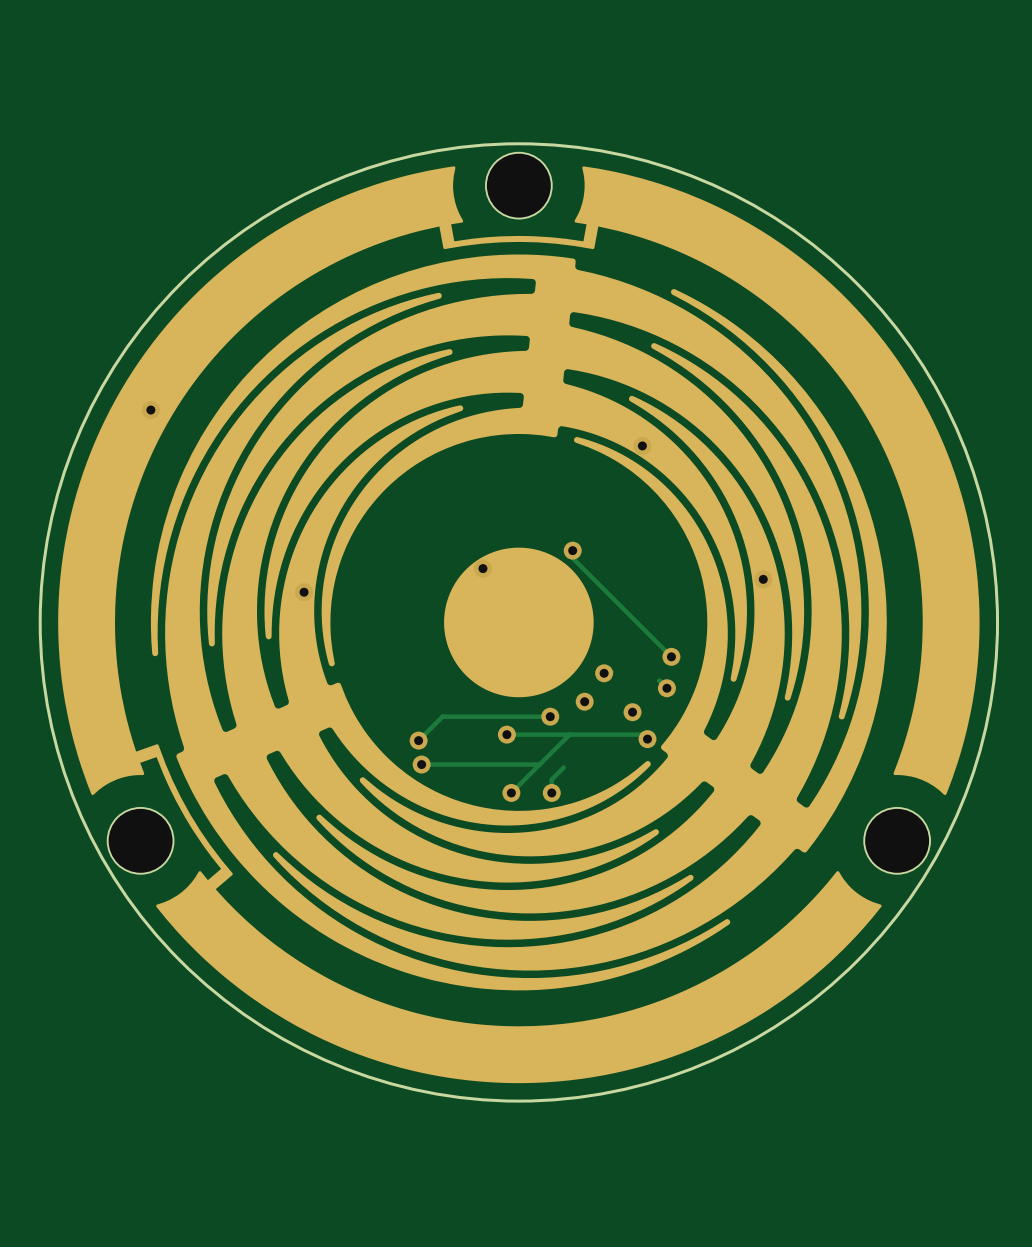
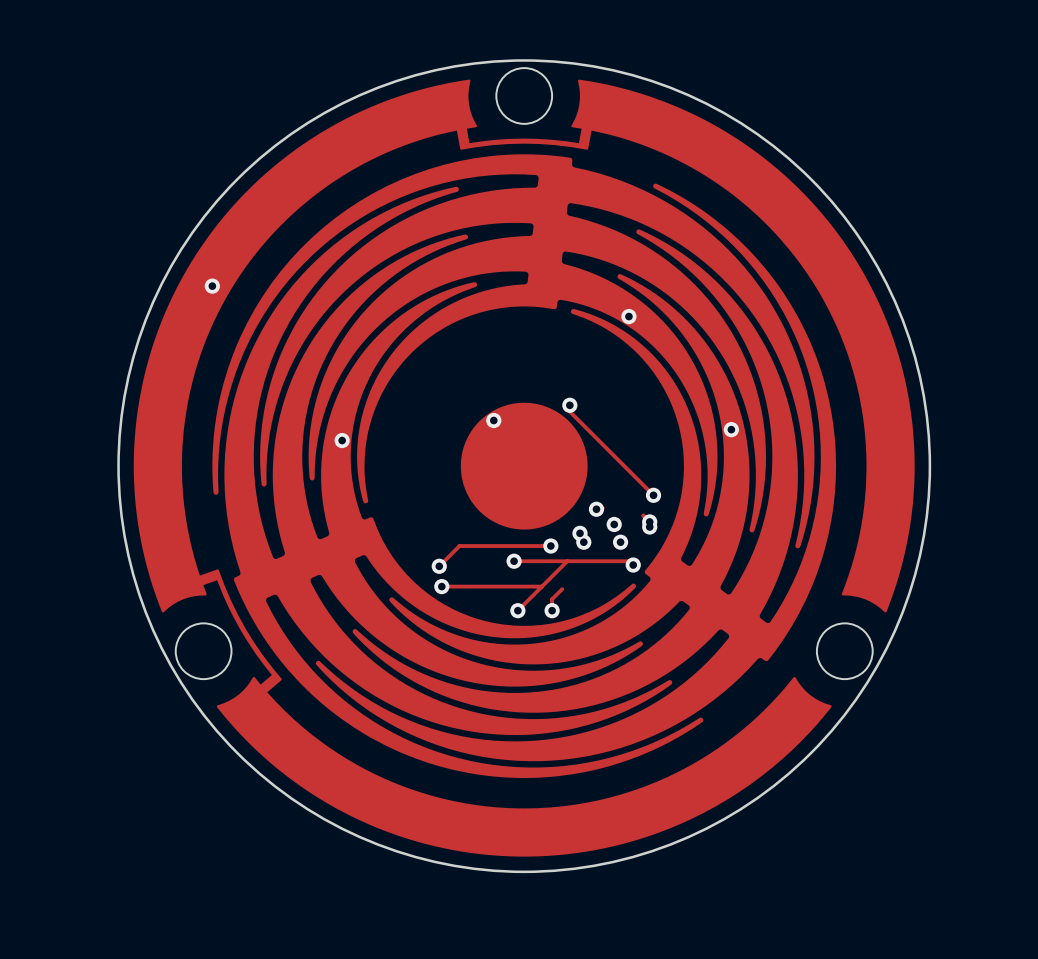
via: none -> (614, 524)
via: none -> (649, 527)
via: none -> (583, 542)

